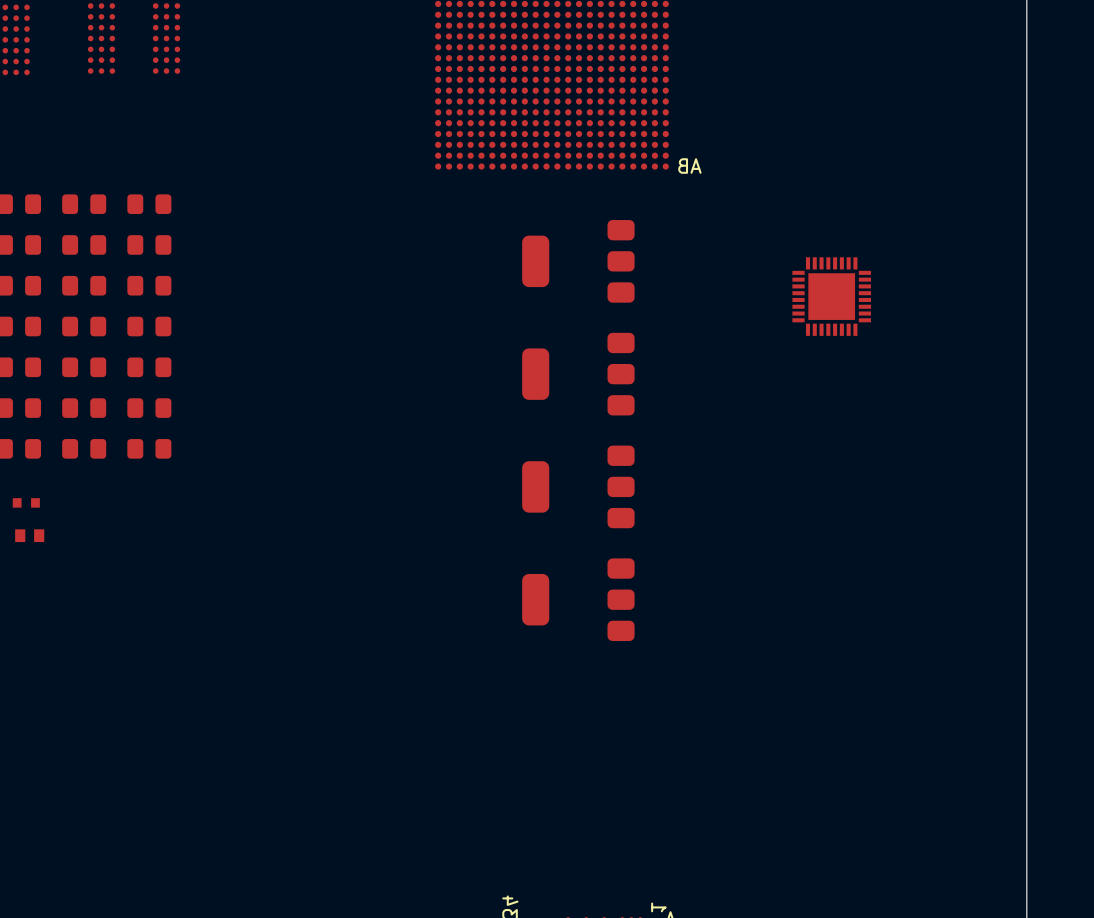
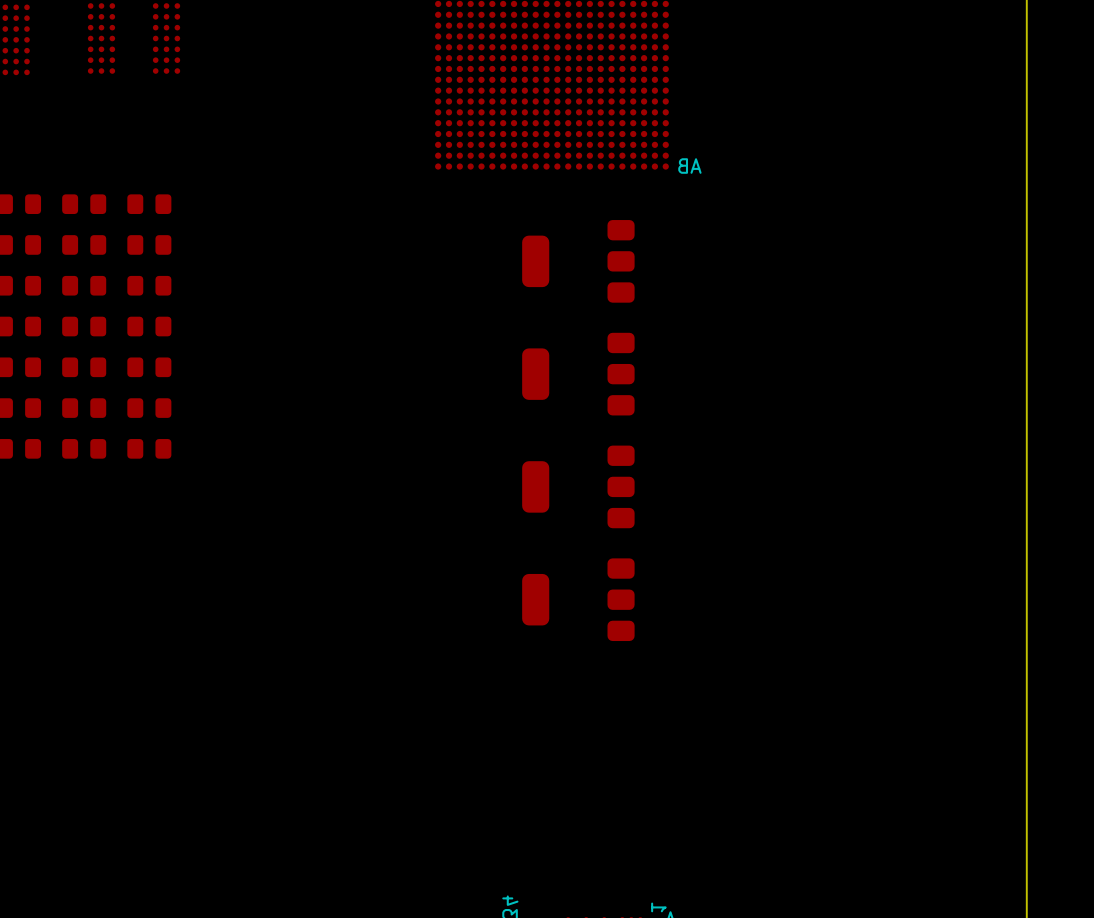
part: (831, 296) -> none
part: (26, 502) -> none
part: (29, 535) -> none

